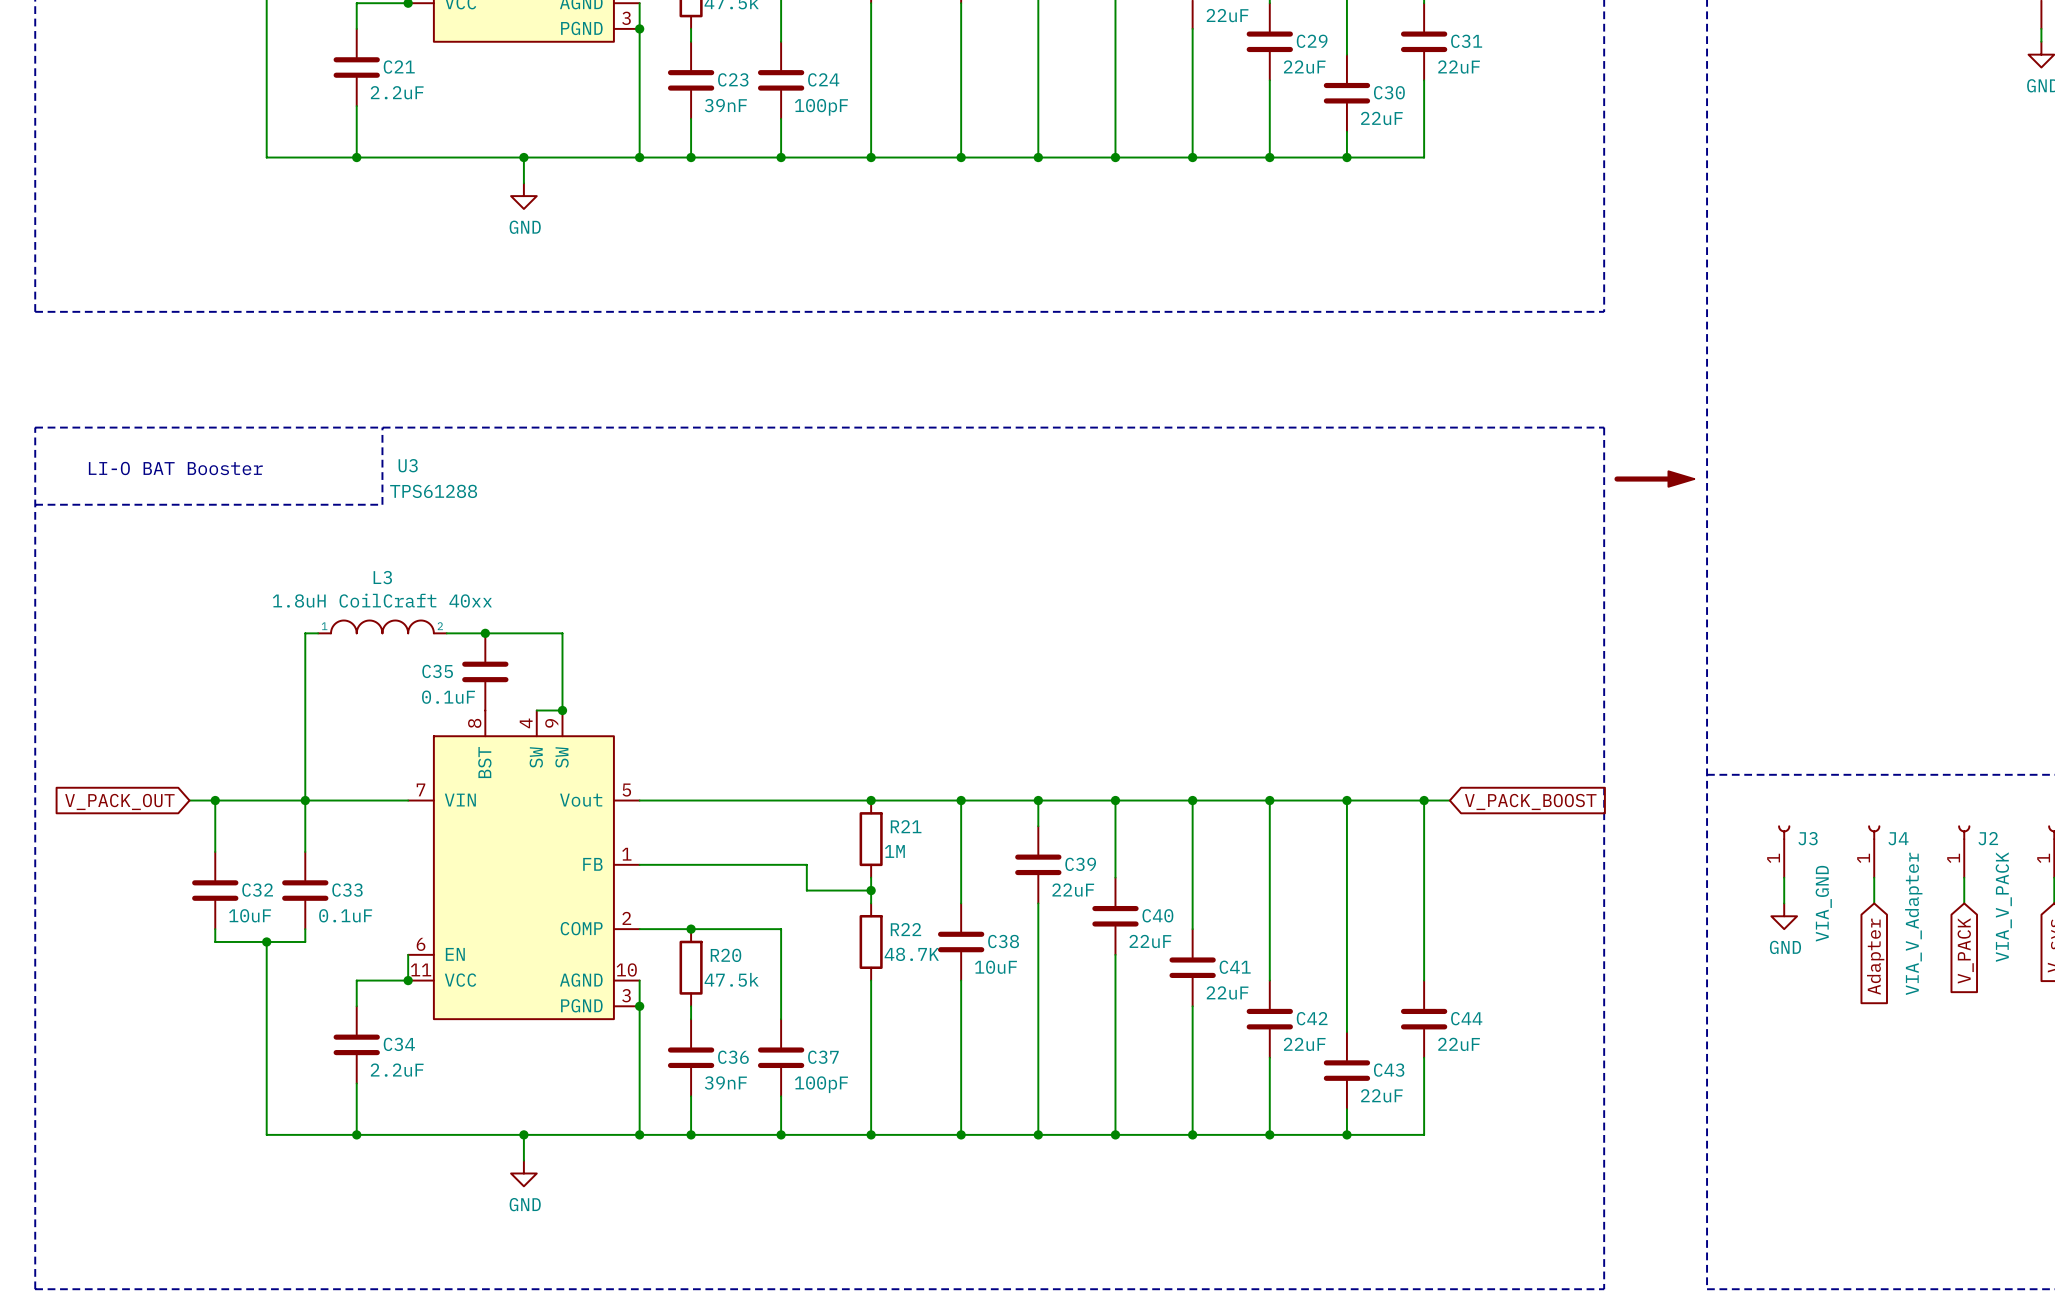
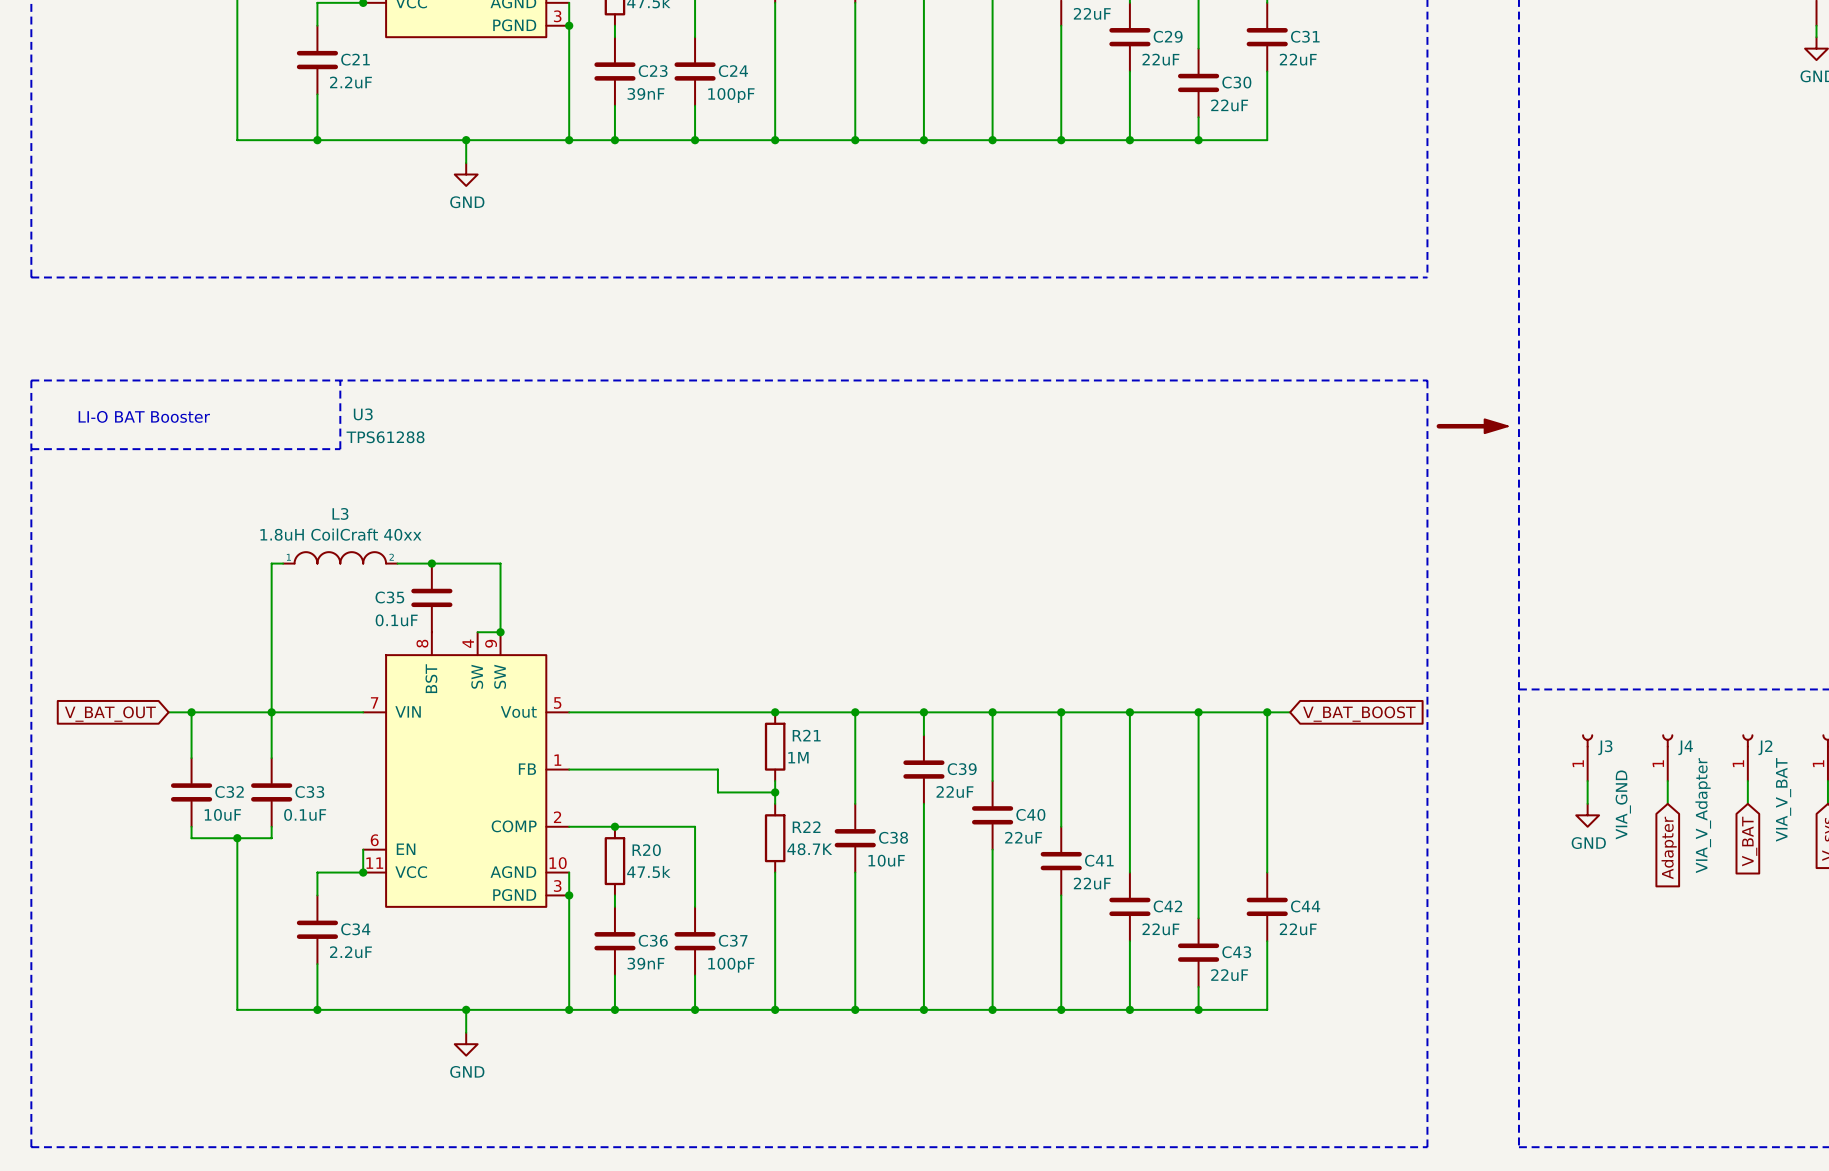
global label: V_PACK_OUT (119, 801) -> V_BAT_OUT (110, 714)
global label: V_PACK_BOOST (1530, 801) -> V_BAT_BOOST (1359, 714)
J2 value: VIA_V_PACK (2003, 907) -> VIA_V_BAT (1783, 799)
global label: V_PACK (1965, 950) -> V_BAT (1749, 841)

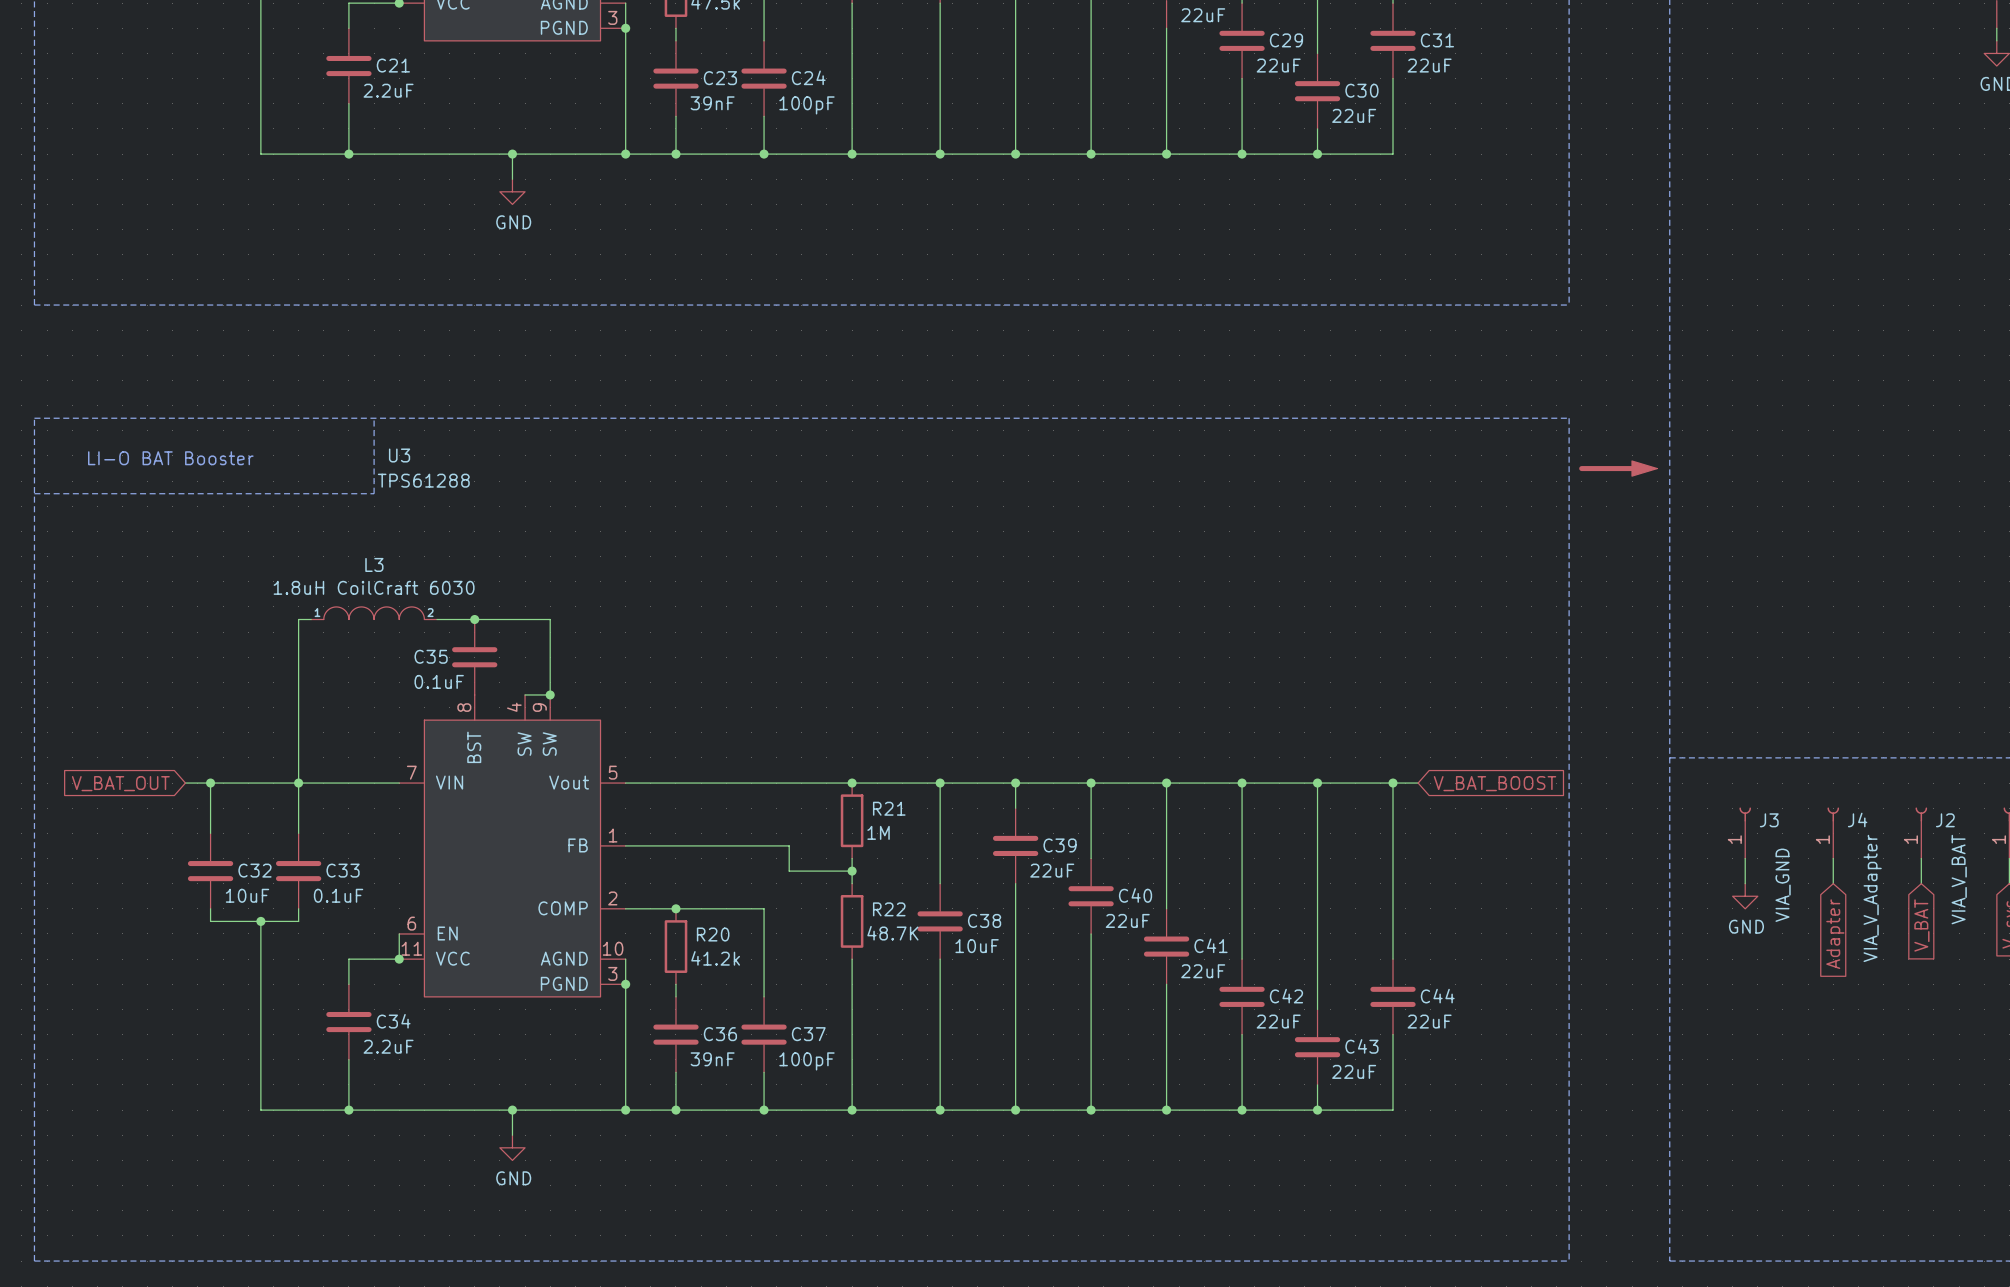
L3 value: 1.8uH CoilCraft 40xx (340, 534) -> 1.8uH CoilCraft 6030 (374, 587)
R20 value: 47.5k (648, 871) -> 41.2k (715, 958)

